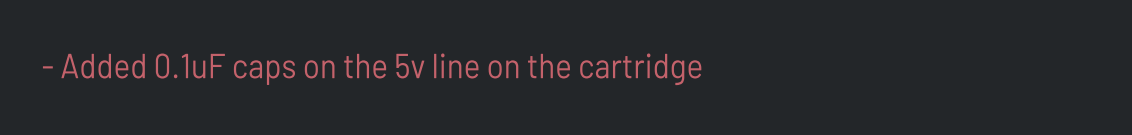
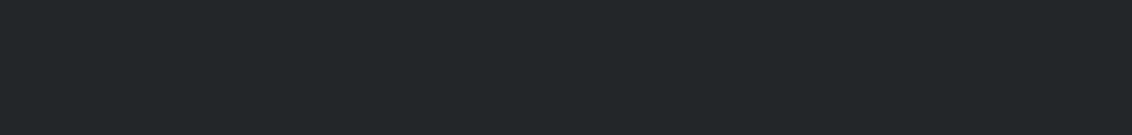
text: - Added 0.1uF caps on the 5v line on the cartridge (372, 69) -> none

